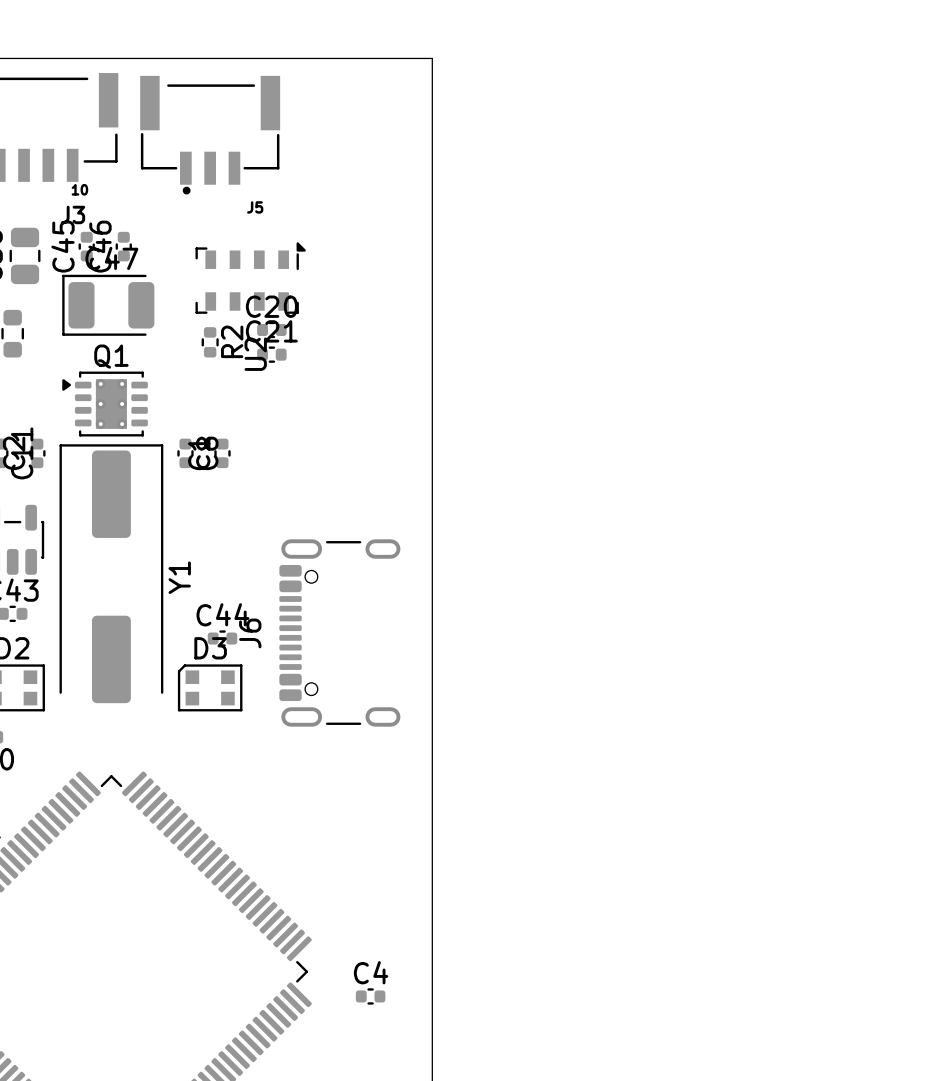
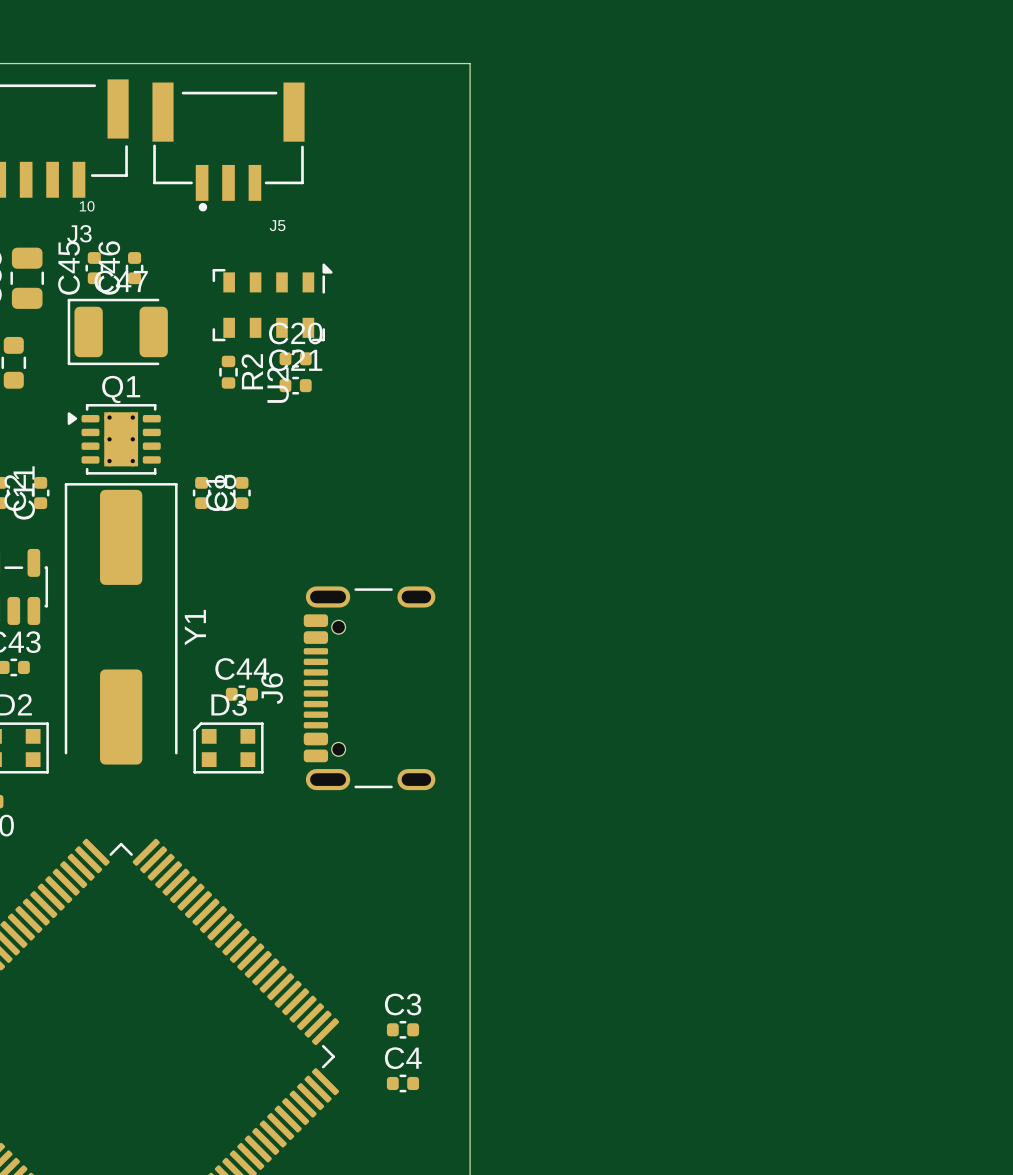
C3: none -> (402, 1029)

